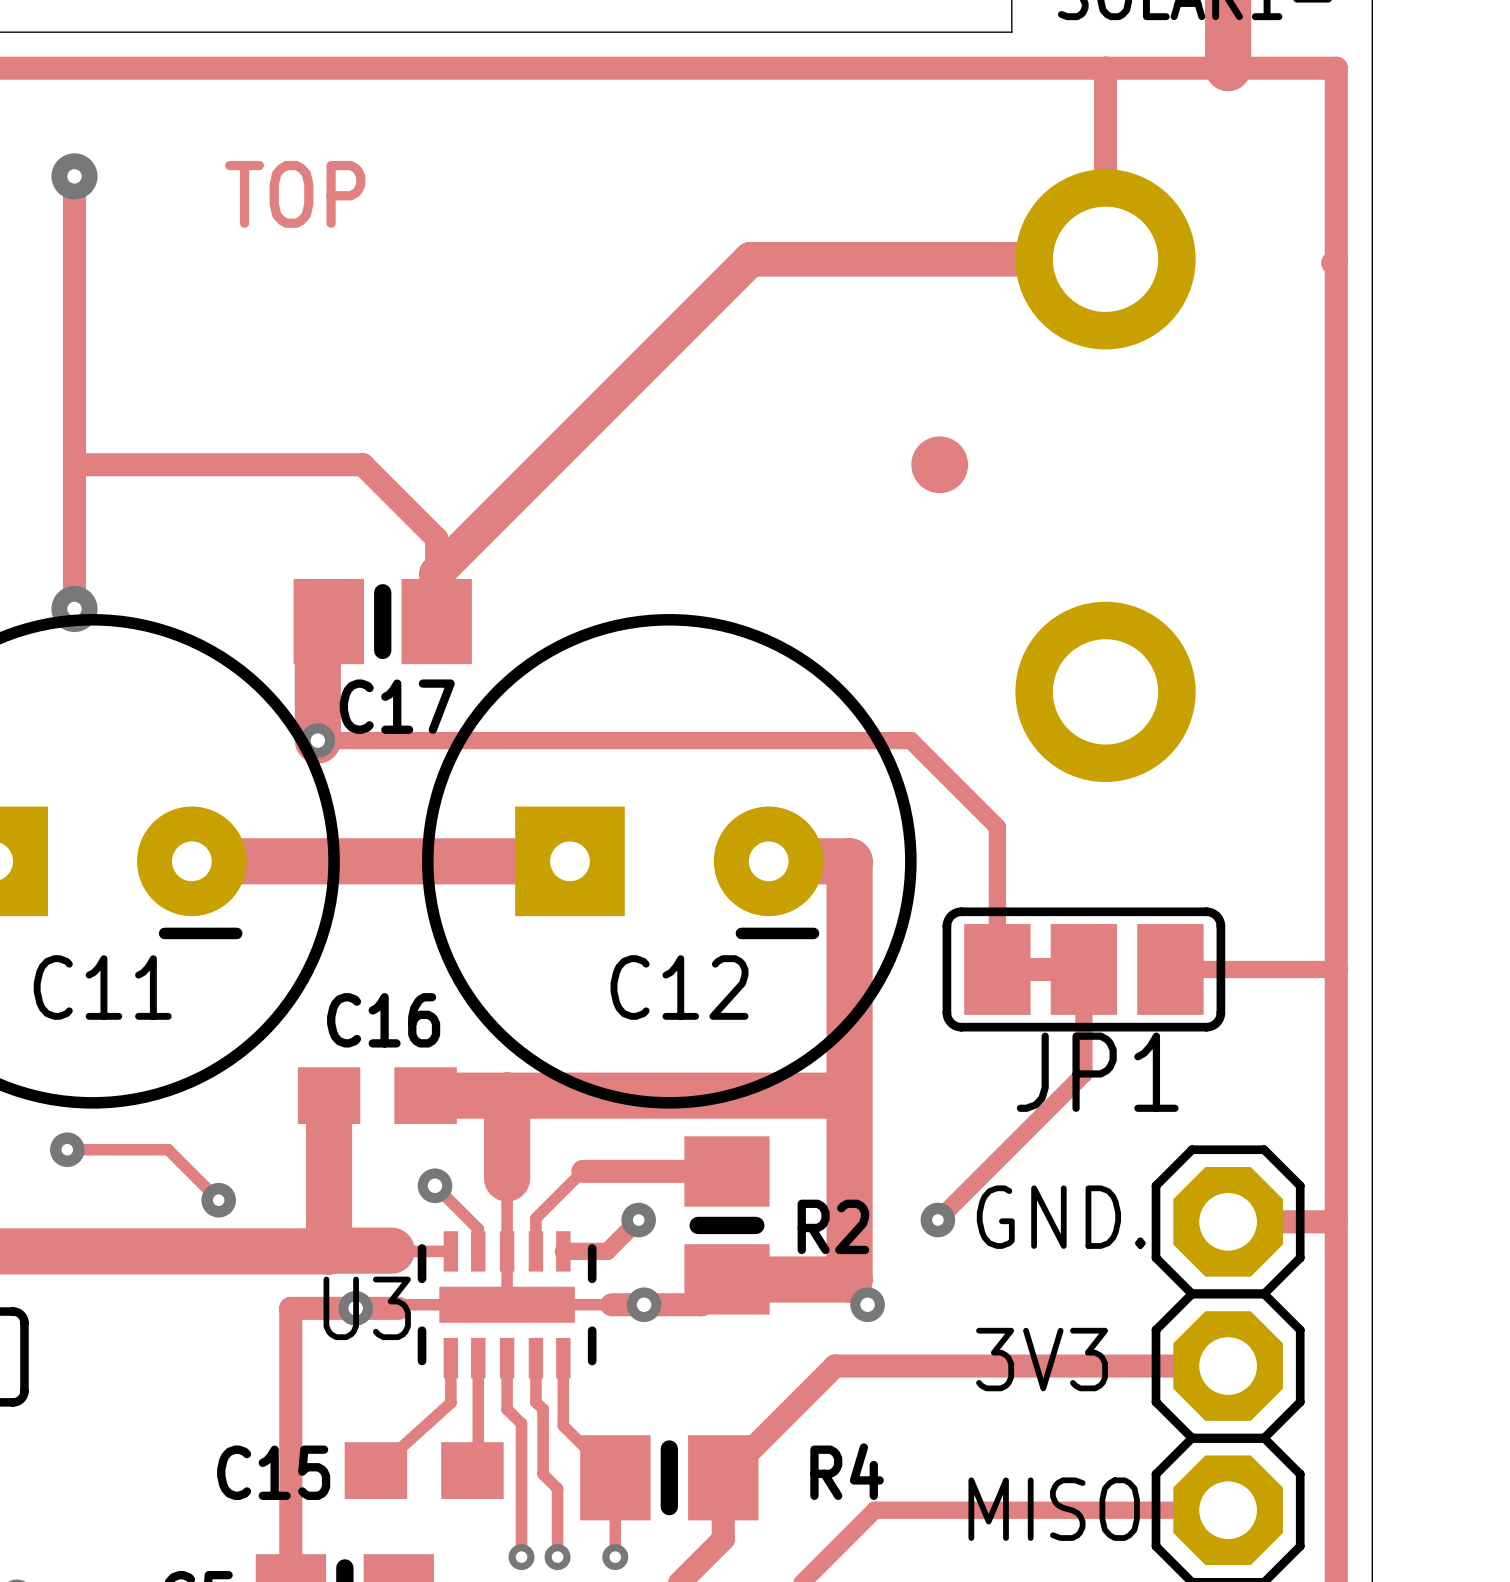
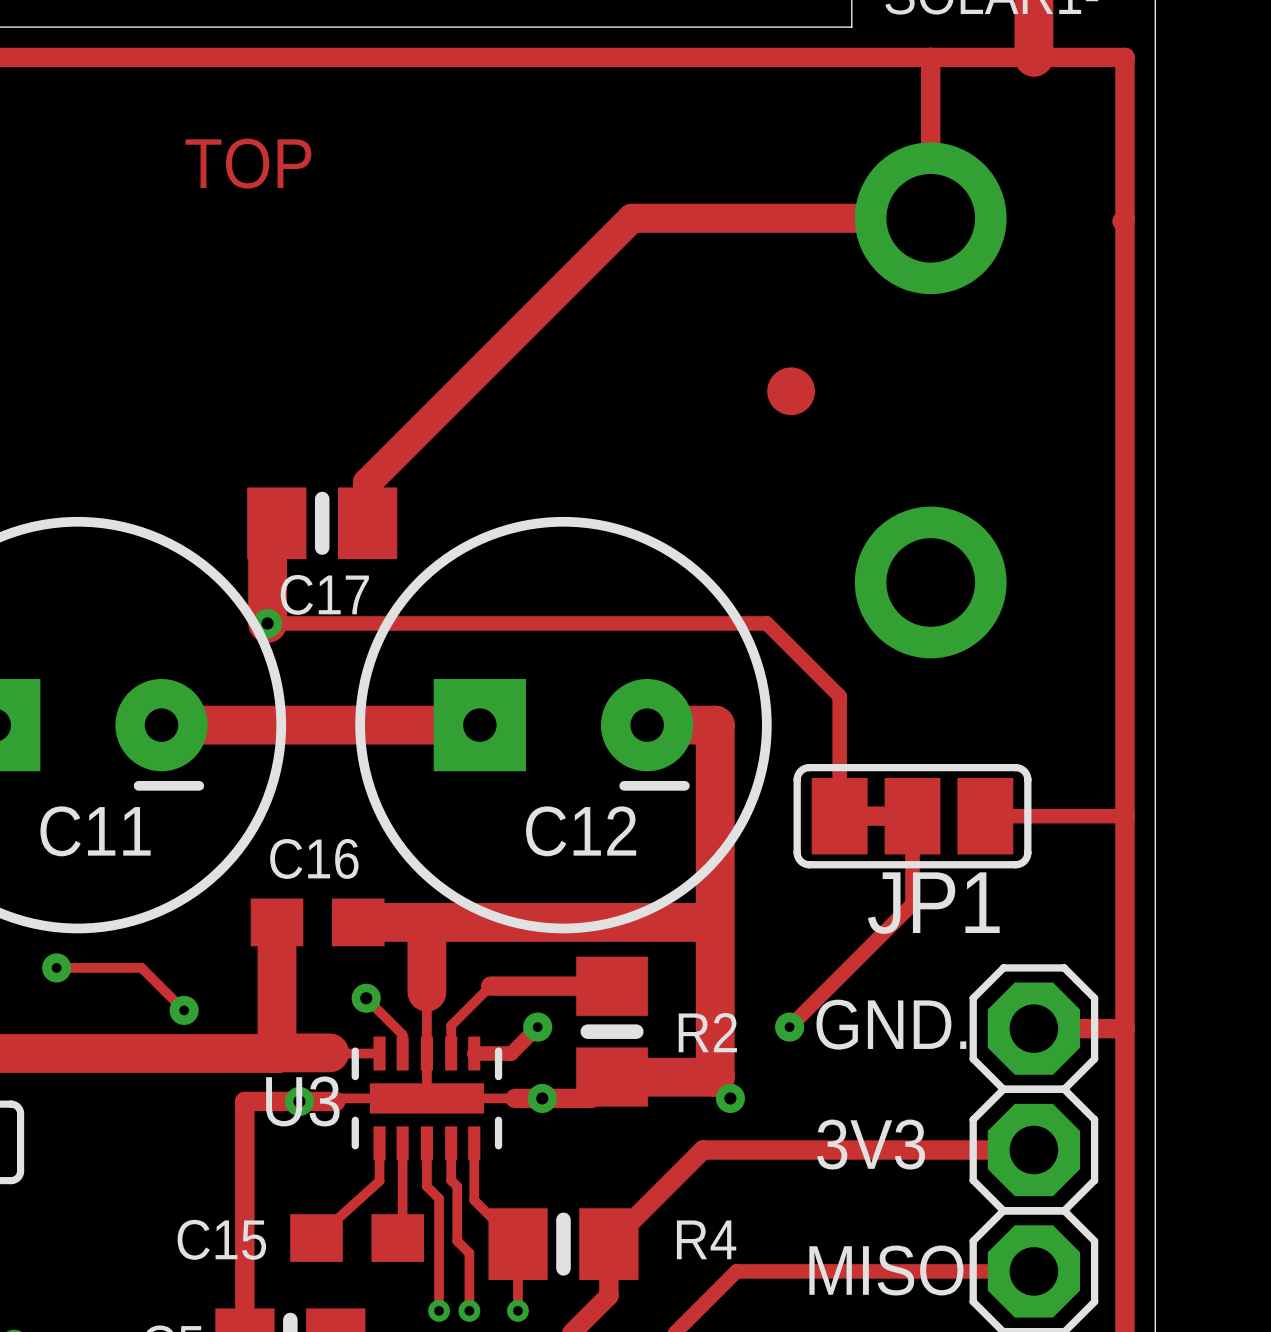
track: (74, 176) (74, 608) -> none
via: (74, 176) -> none
track: (74, 464) (362, 464) (436, 538) (436, 621) -> none
via: (74, 608) -> none

